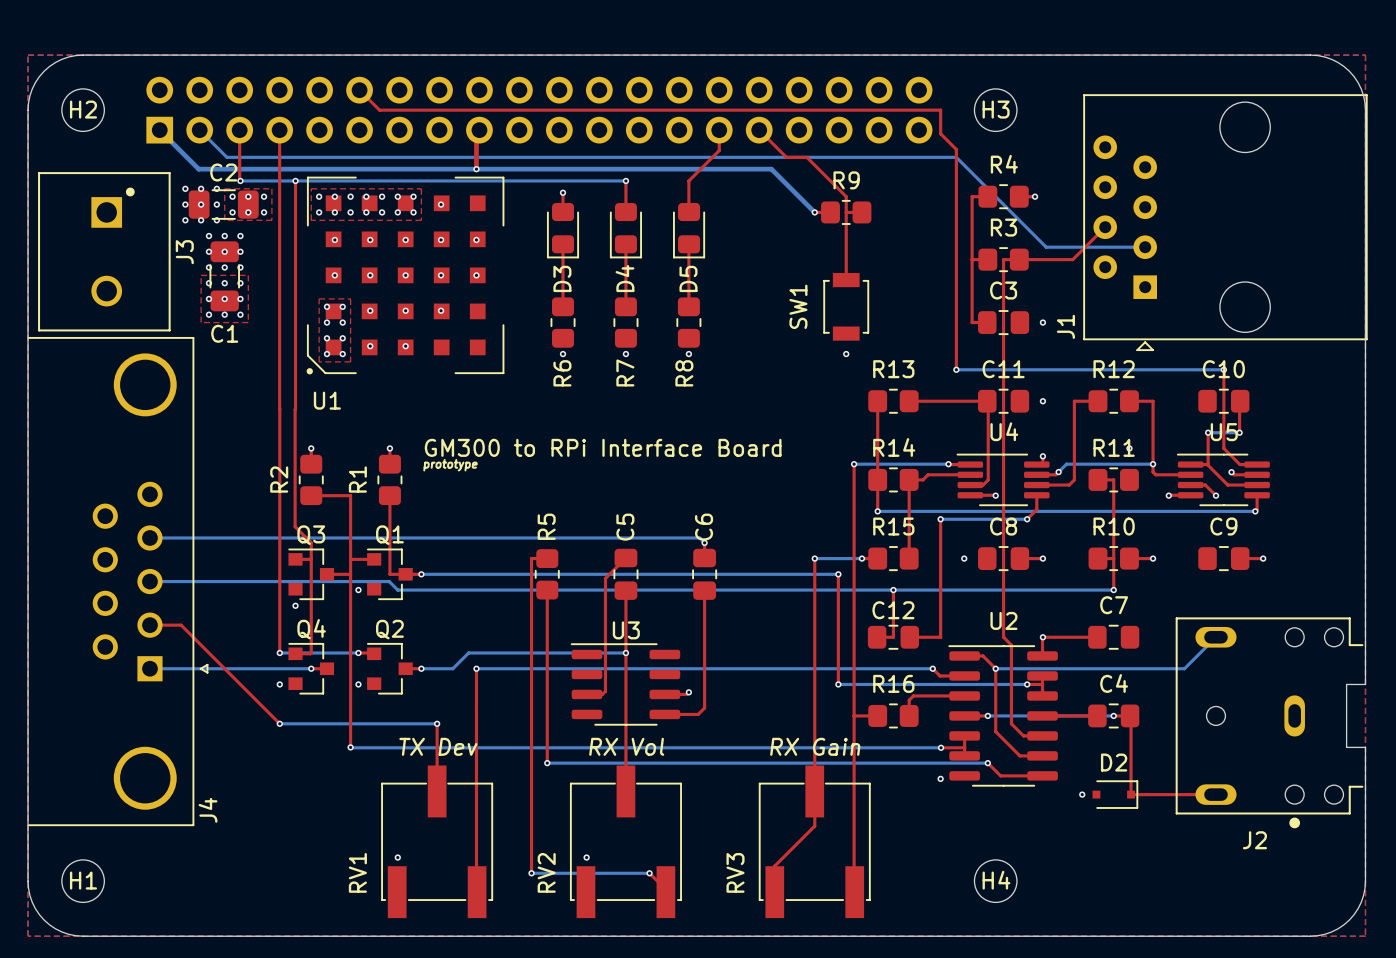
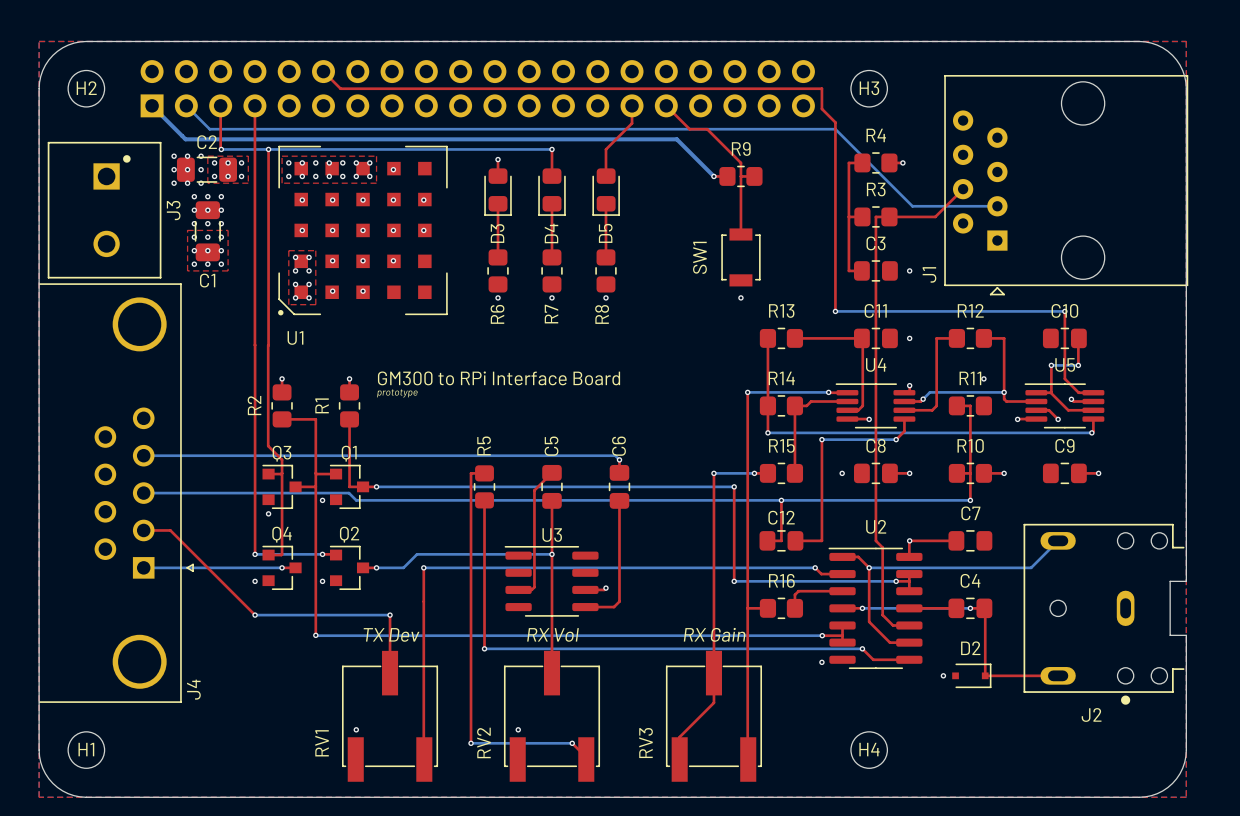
top track: (479, 130) (476, 133) (476, 169) -> none
via: (476, 169) -> none

